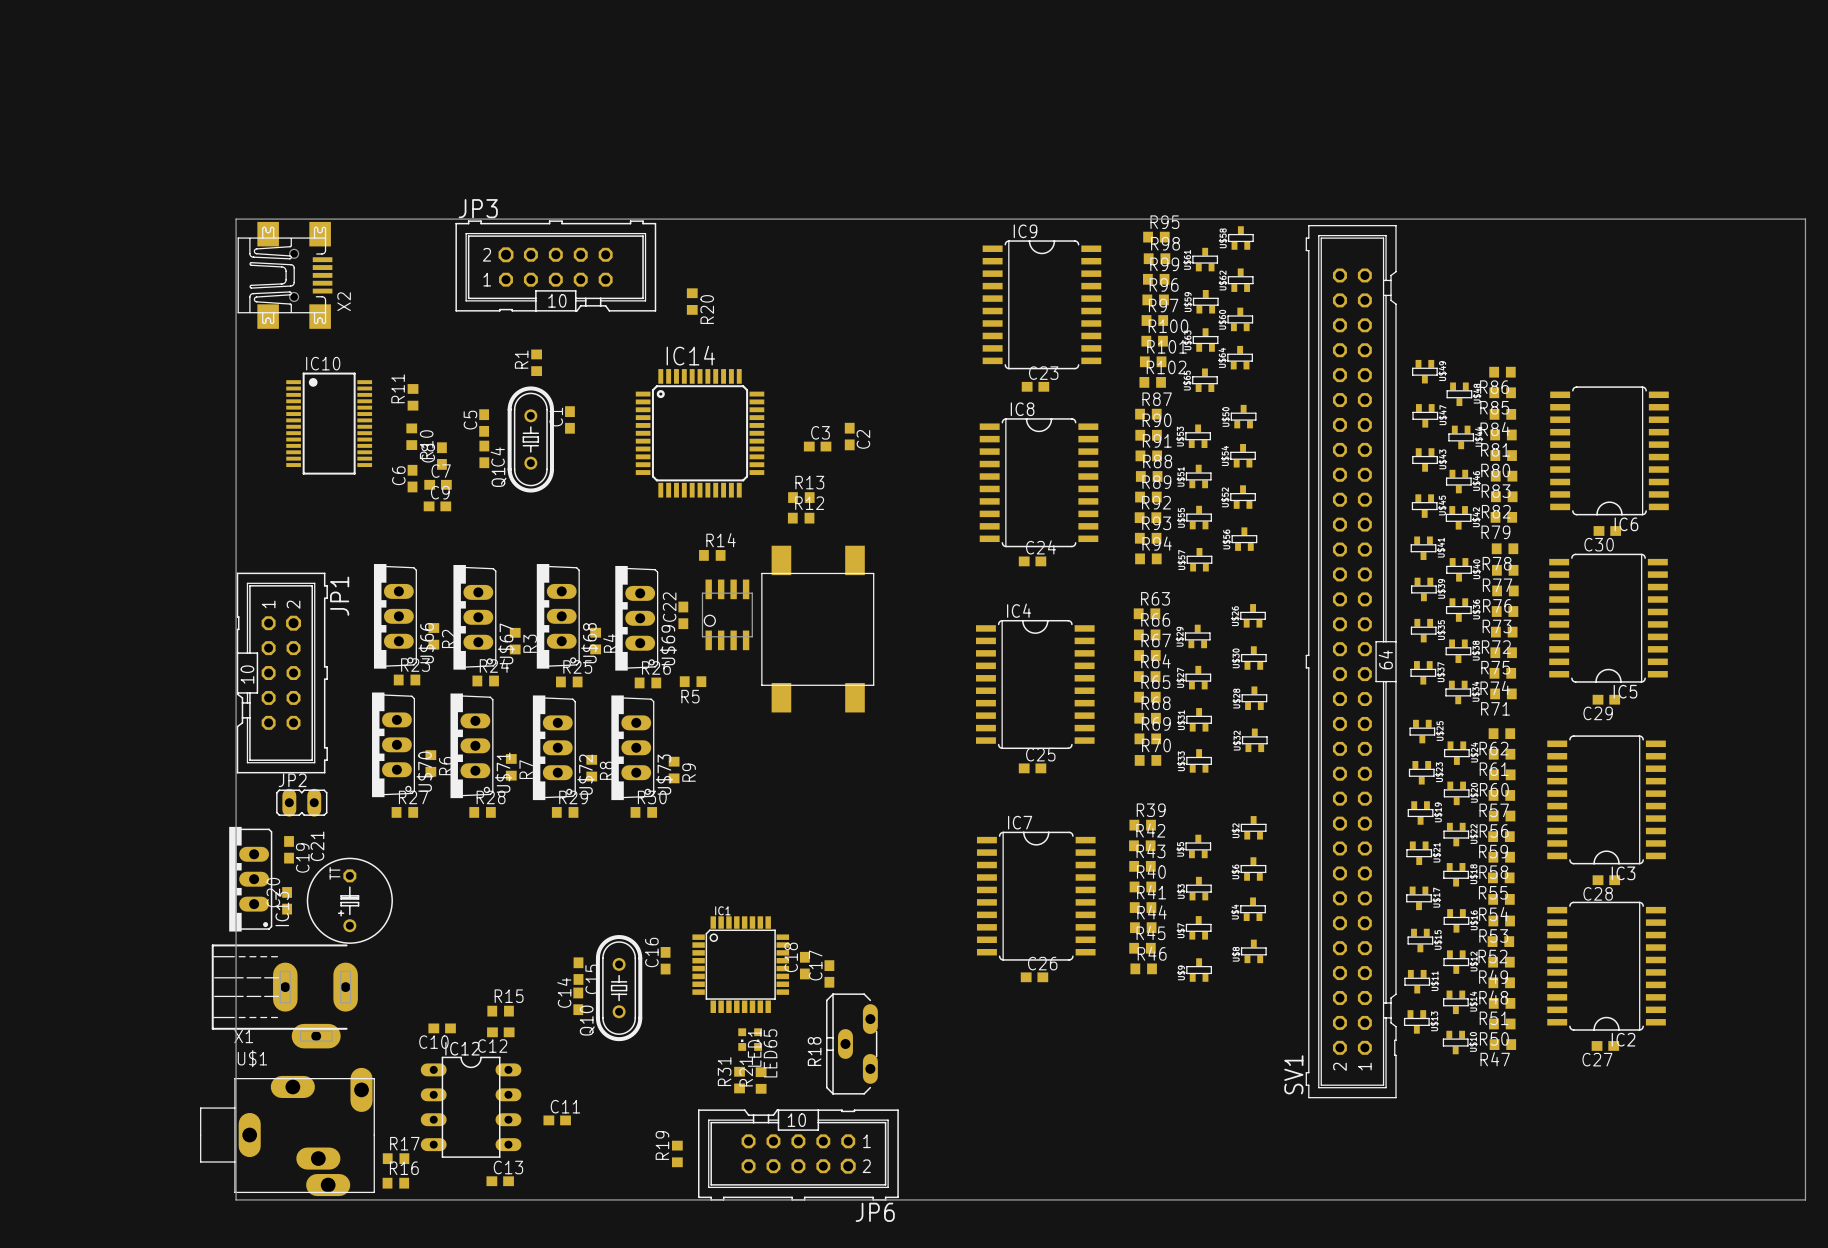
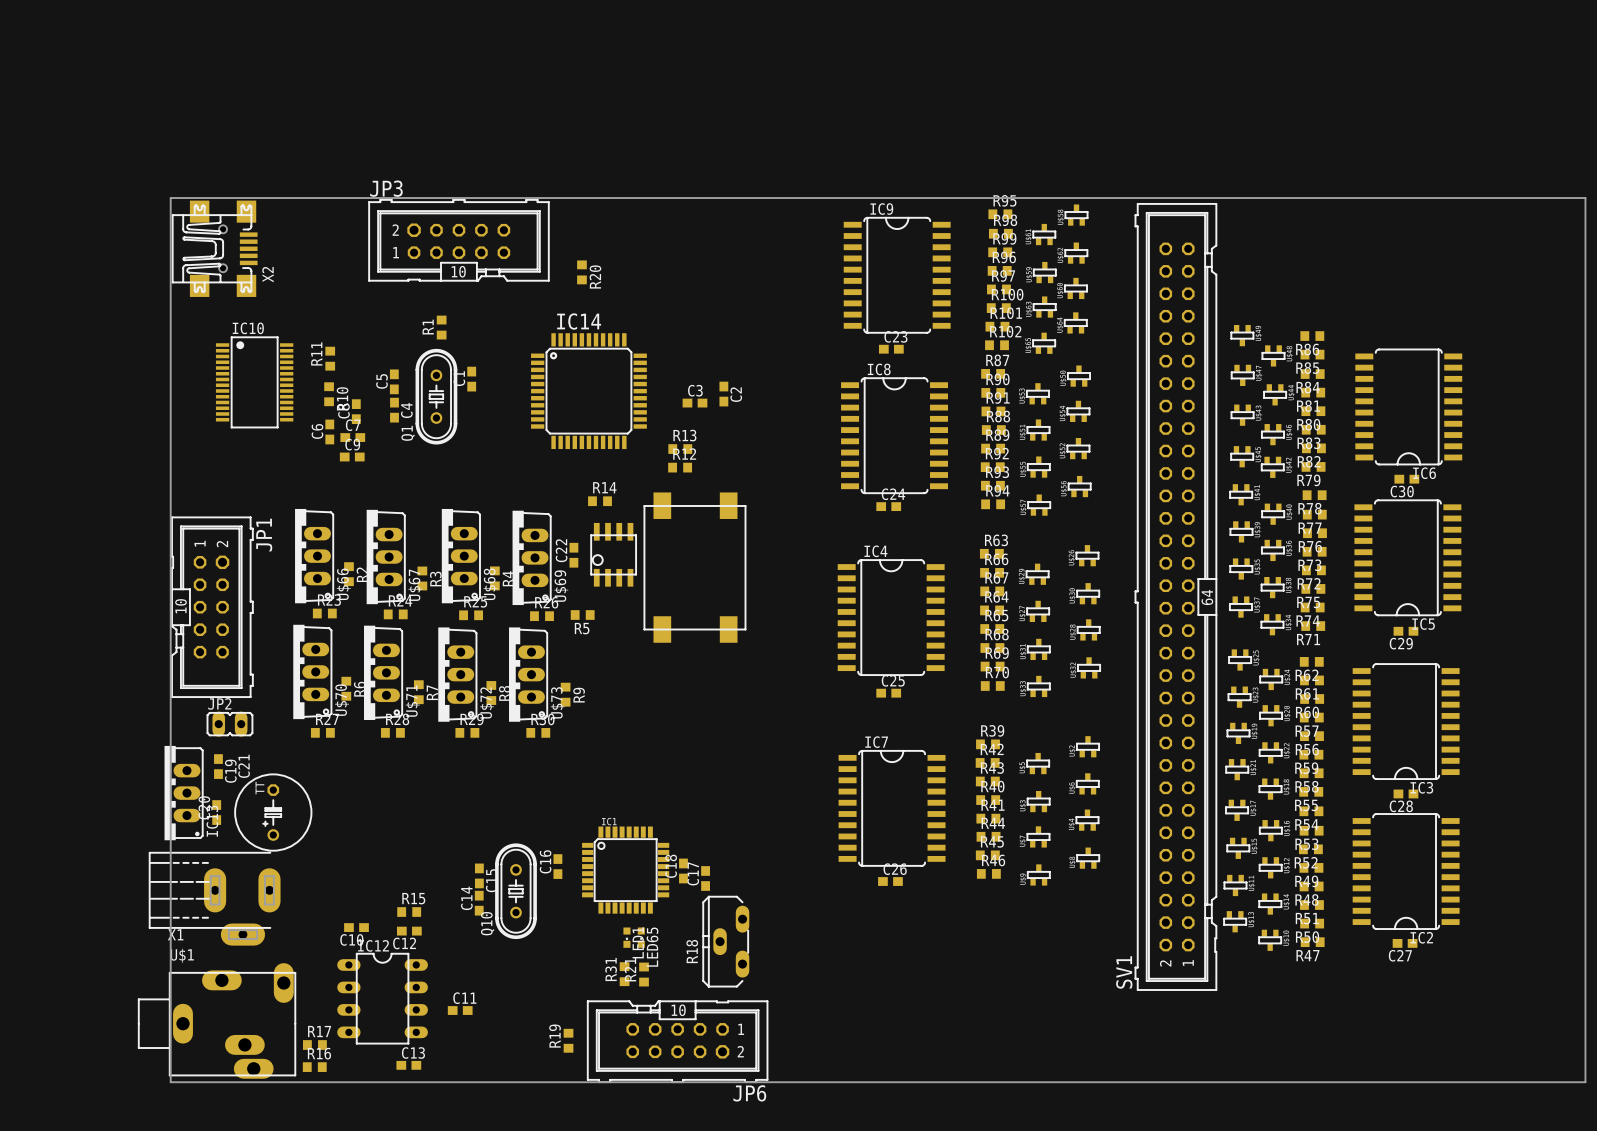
part footprint: [761, 545, 875, 713] -> [643, 492, 747, 643]
part footprint: [701, 579, 753, 651] -> [590, 522, 637, 587]

